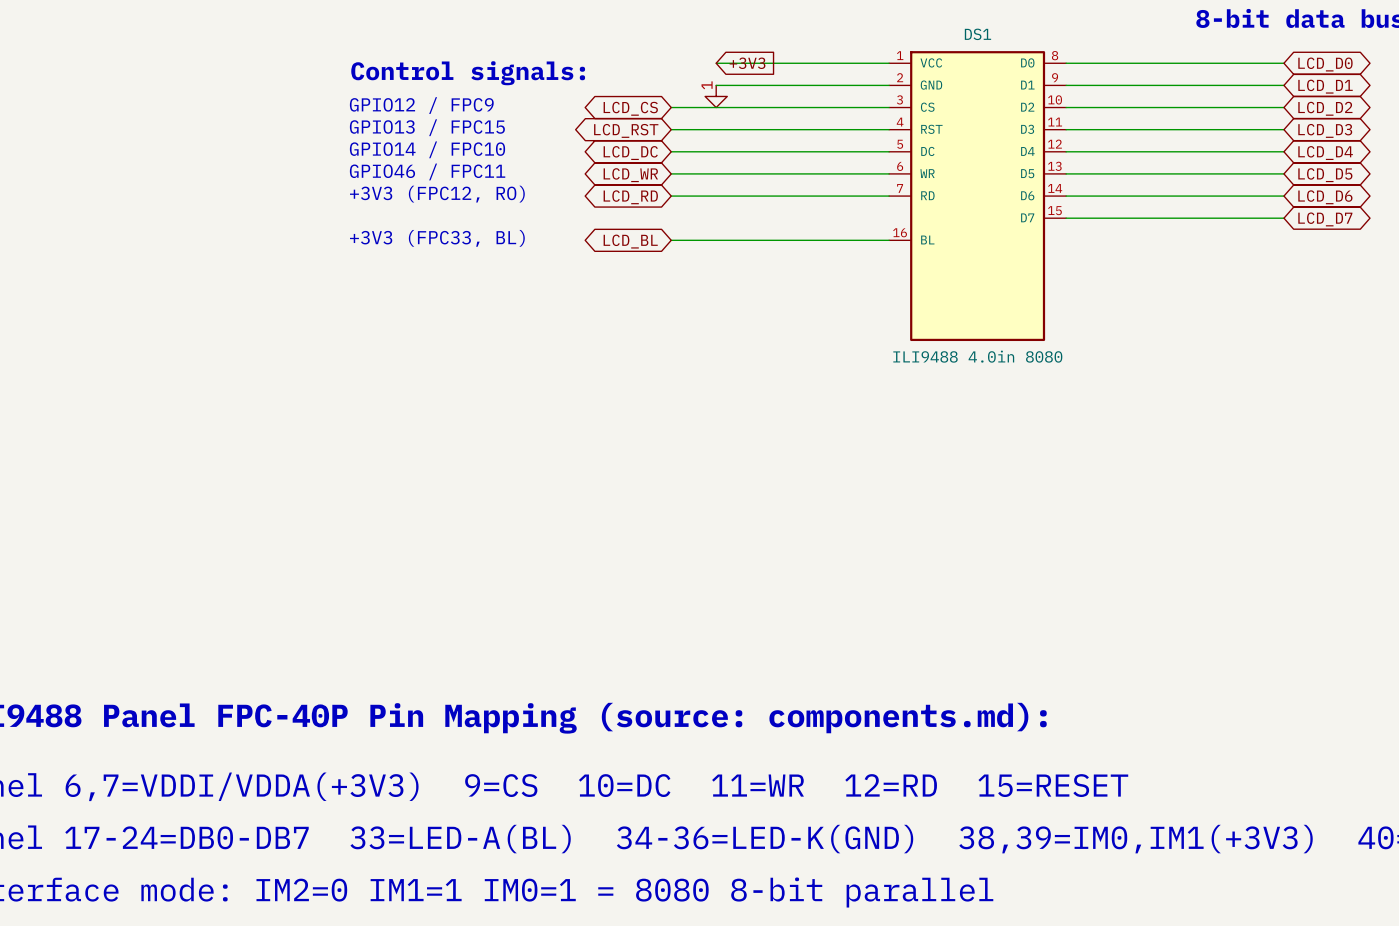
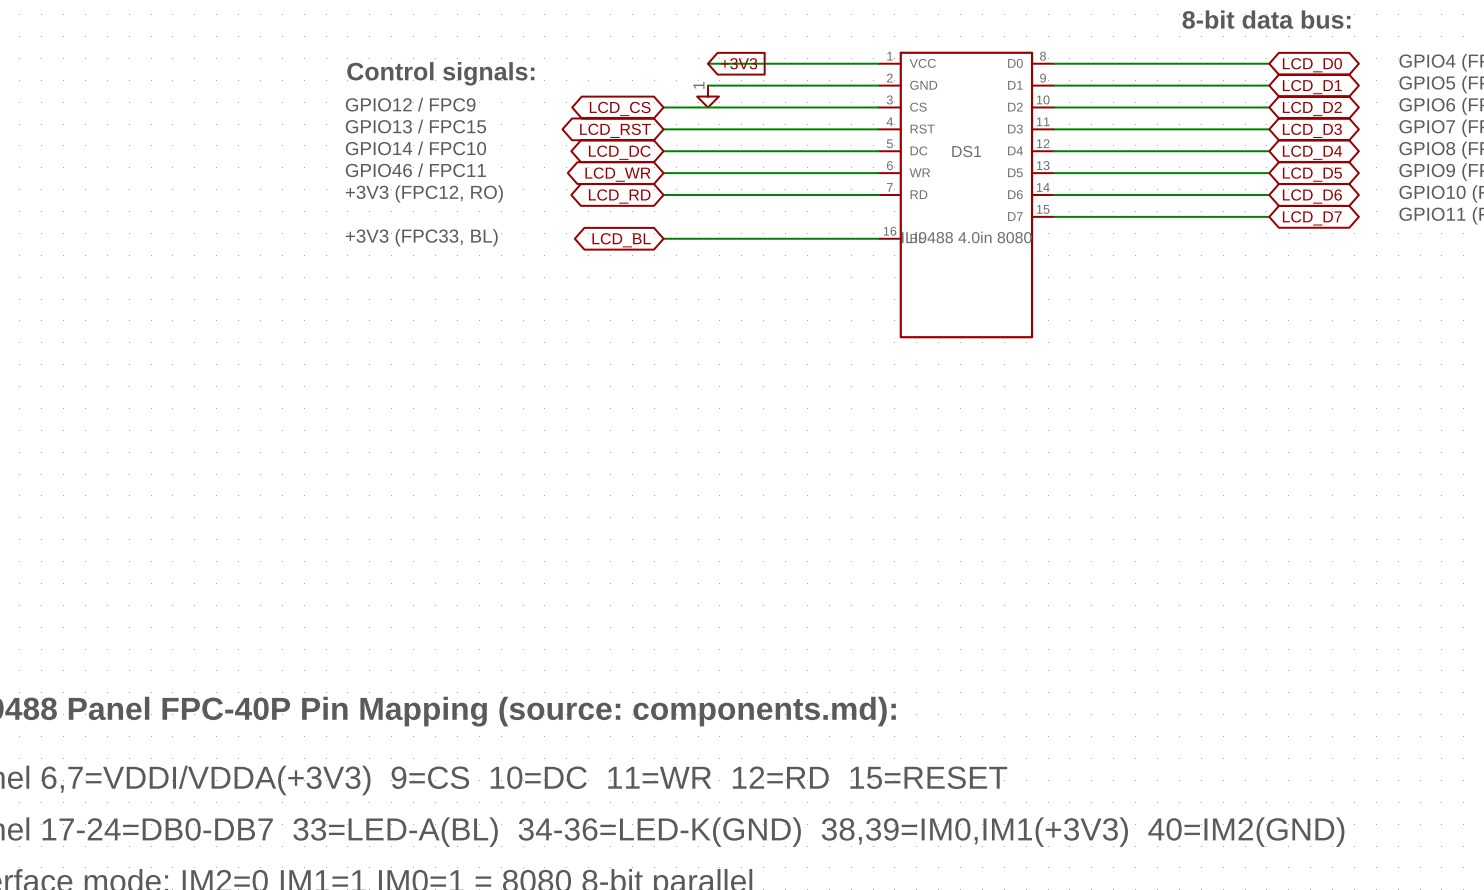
DS1 name position: DS1 (977, 34) -> DS1 (966, 151)
DS1 value position: ILI9488 4.0in 8080 (977, 356) -> ILI9488 4.0in 8080 (966, 237)

